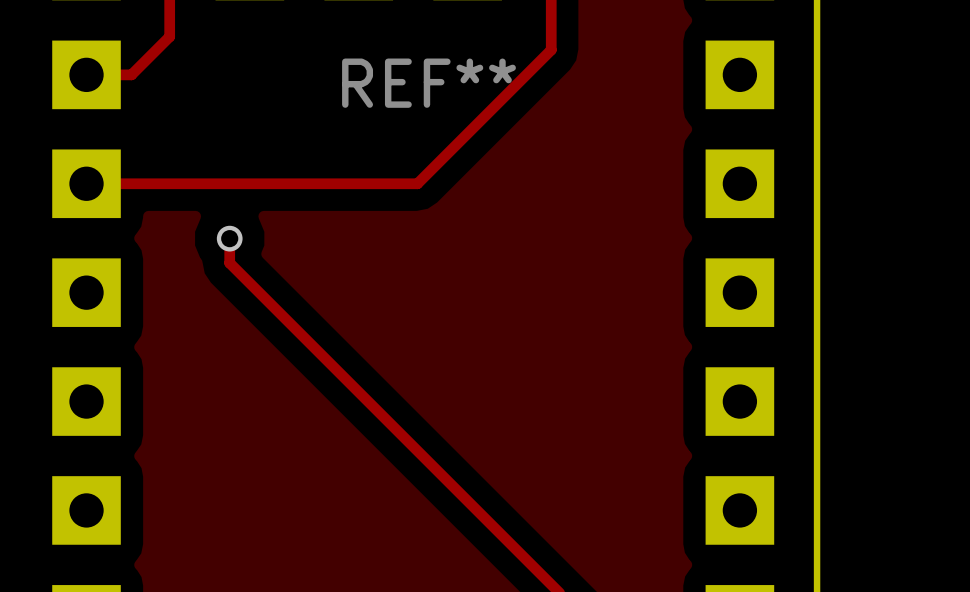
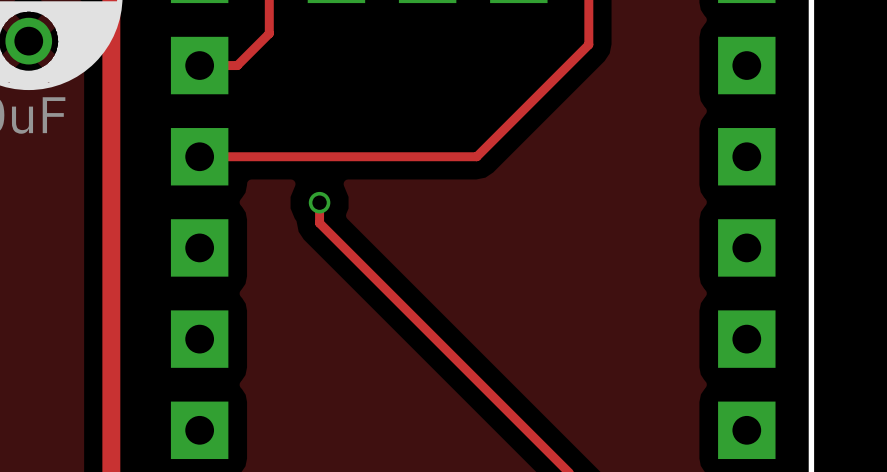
REF**: (429, 83) -> none

